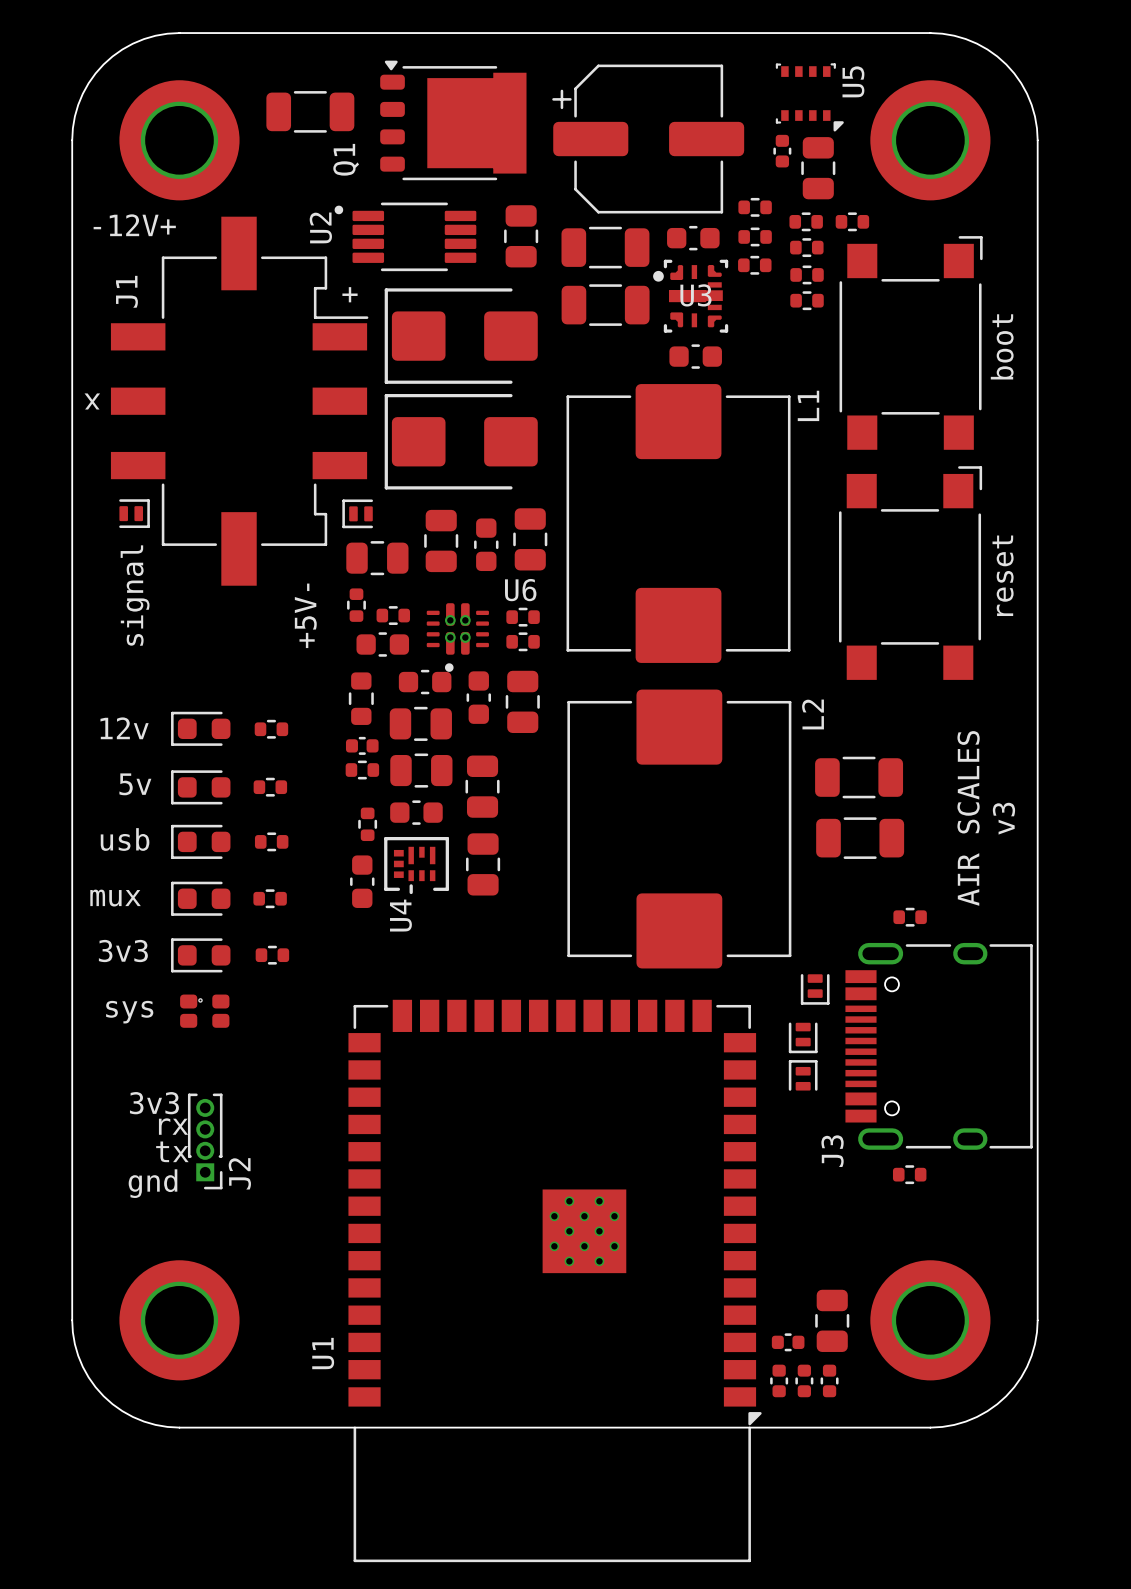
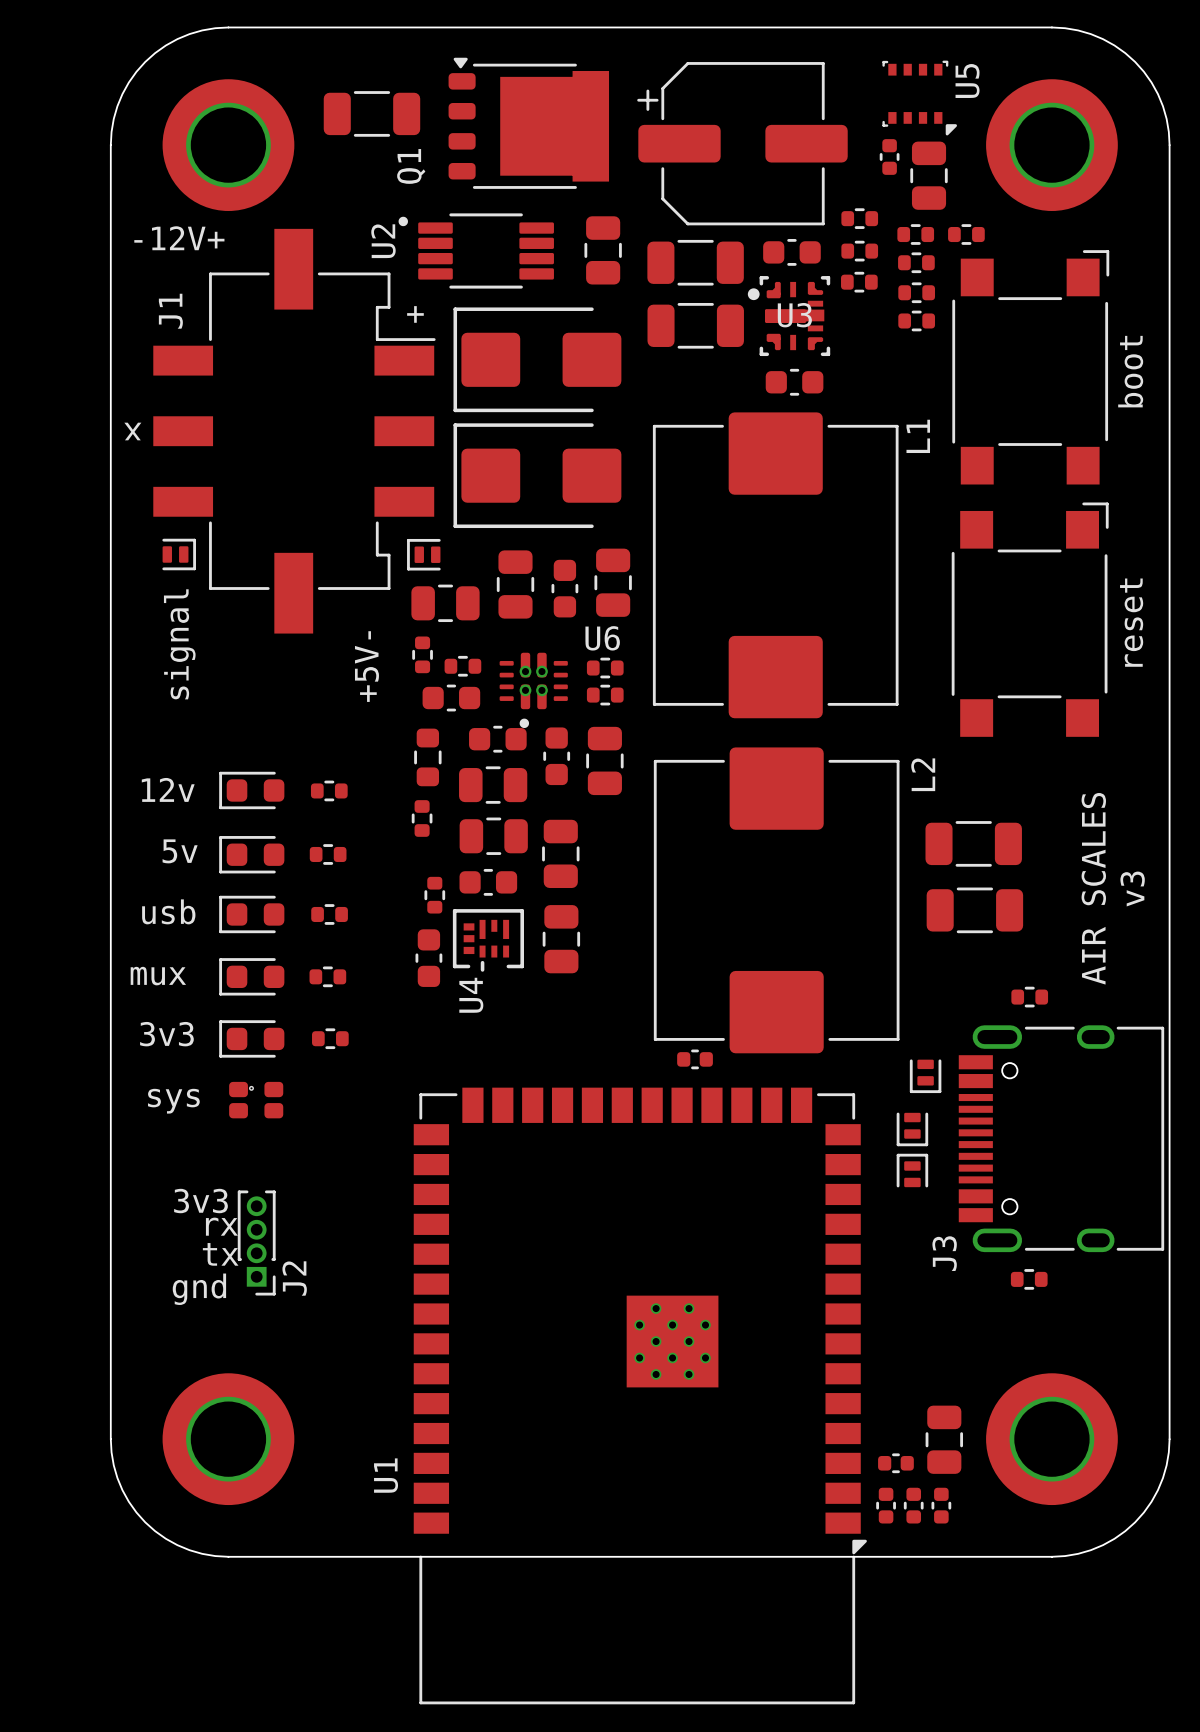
part position: (362, 745) -> (695, 1059)
part rotation: 0° (362, 770) -> 90° clockwise (422, 818)

